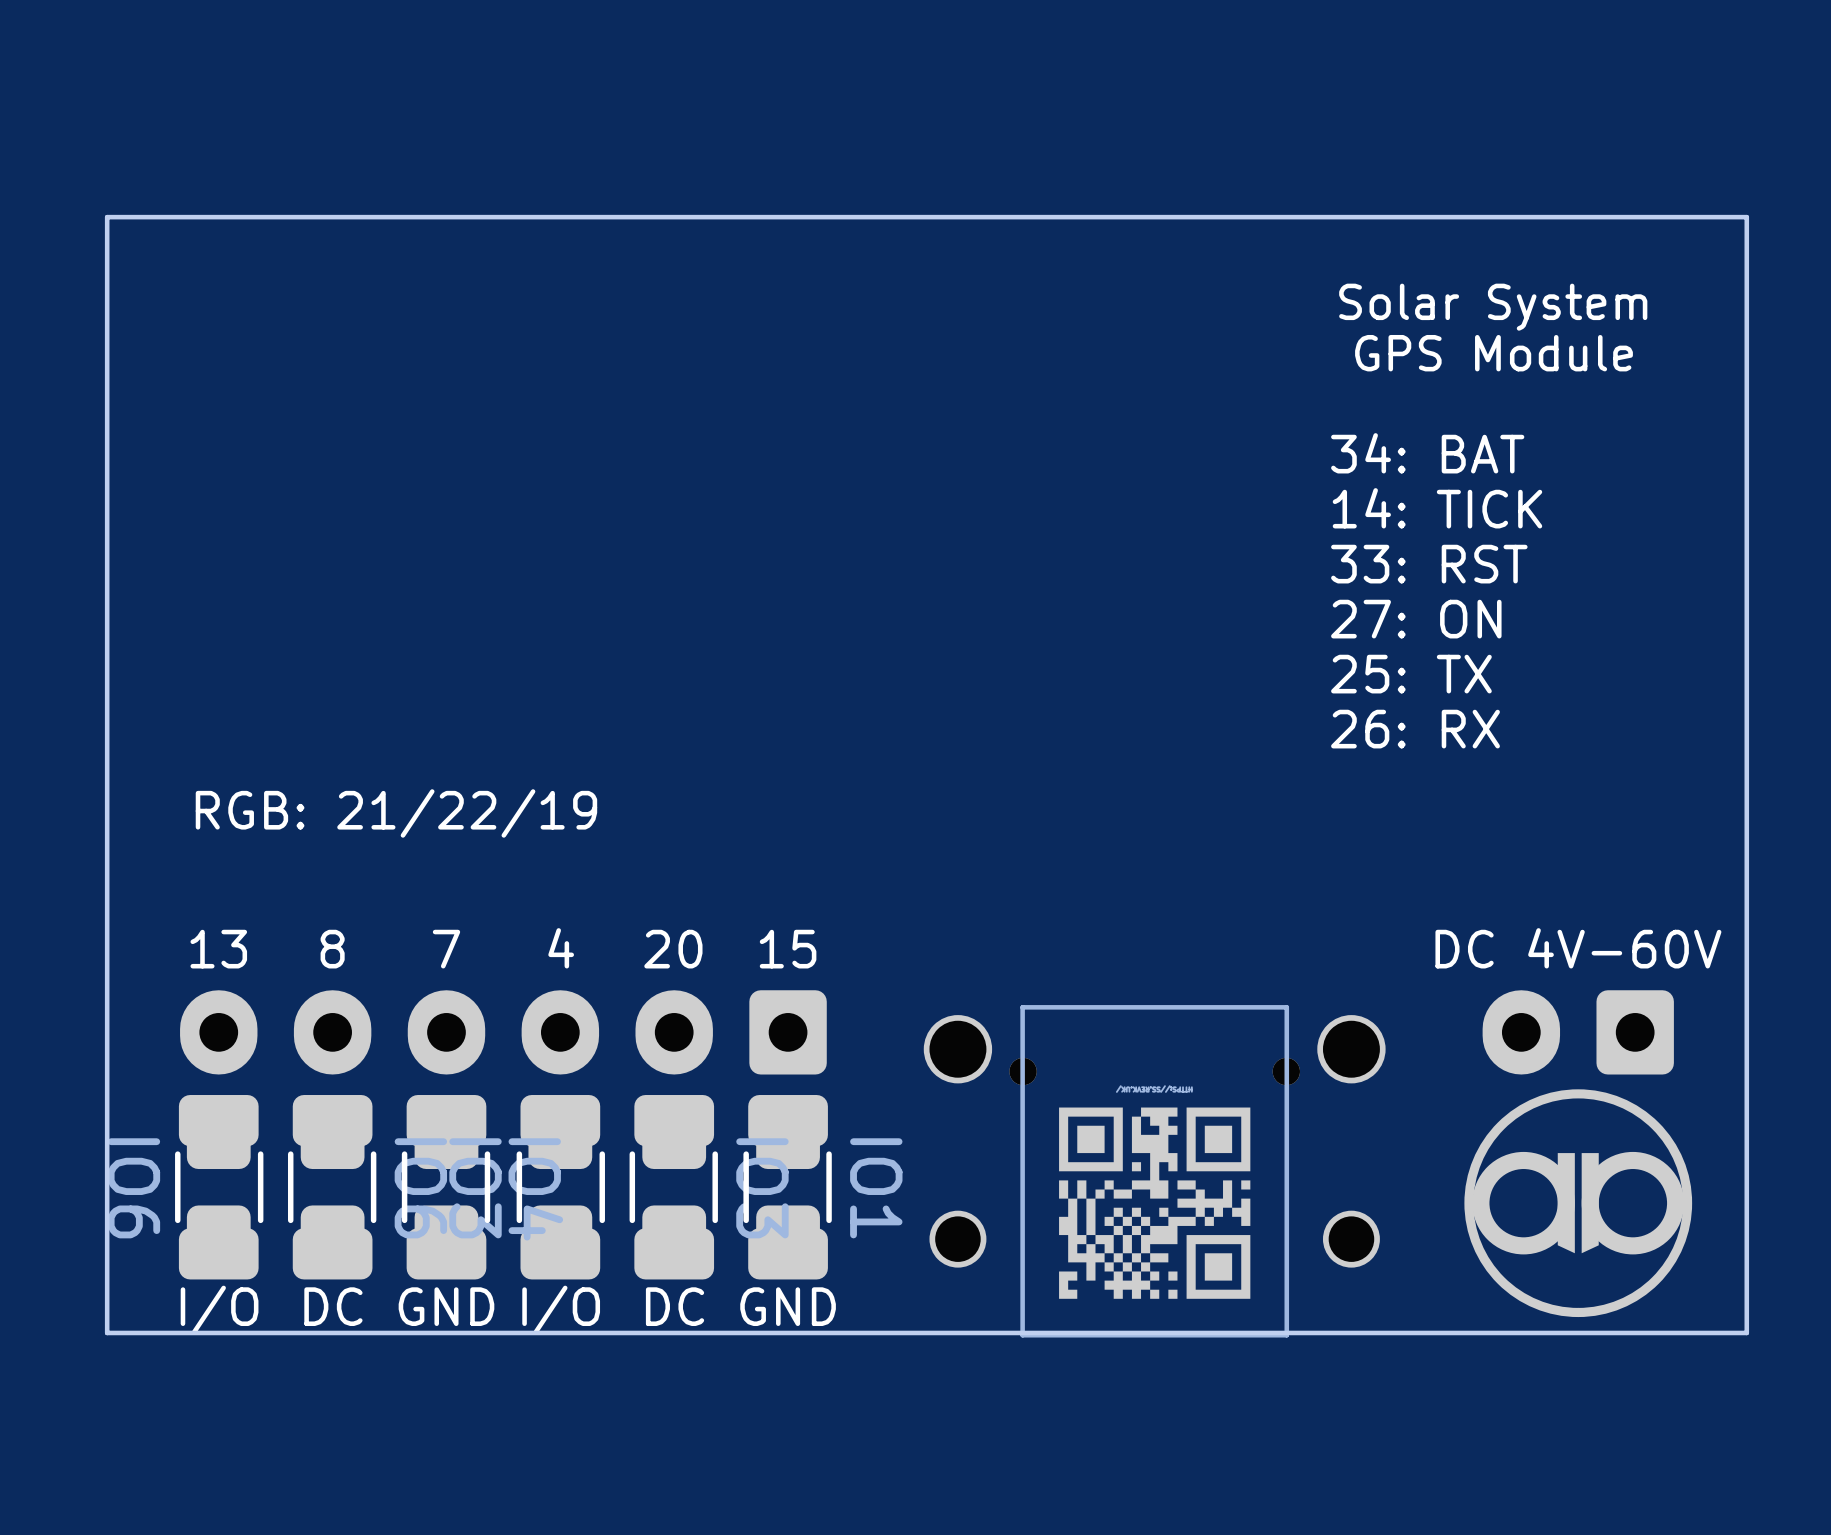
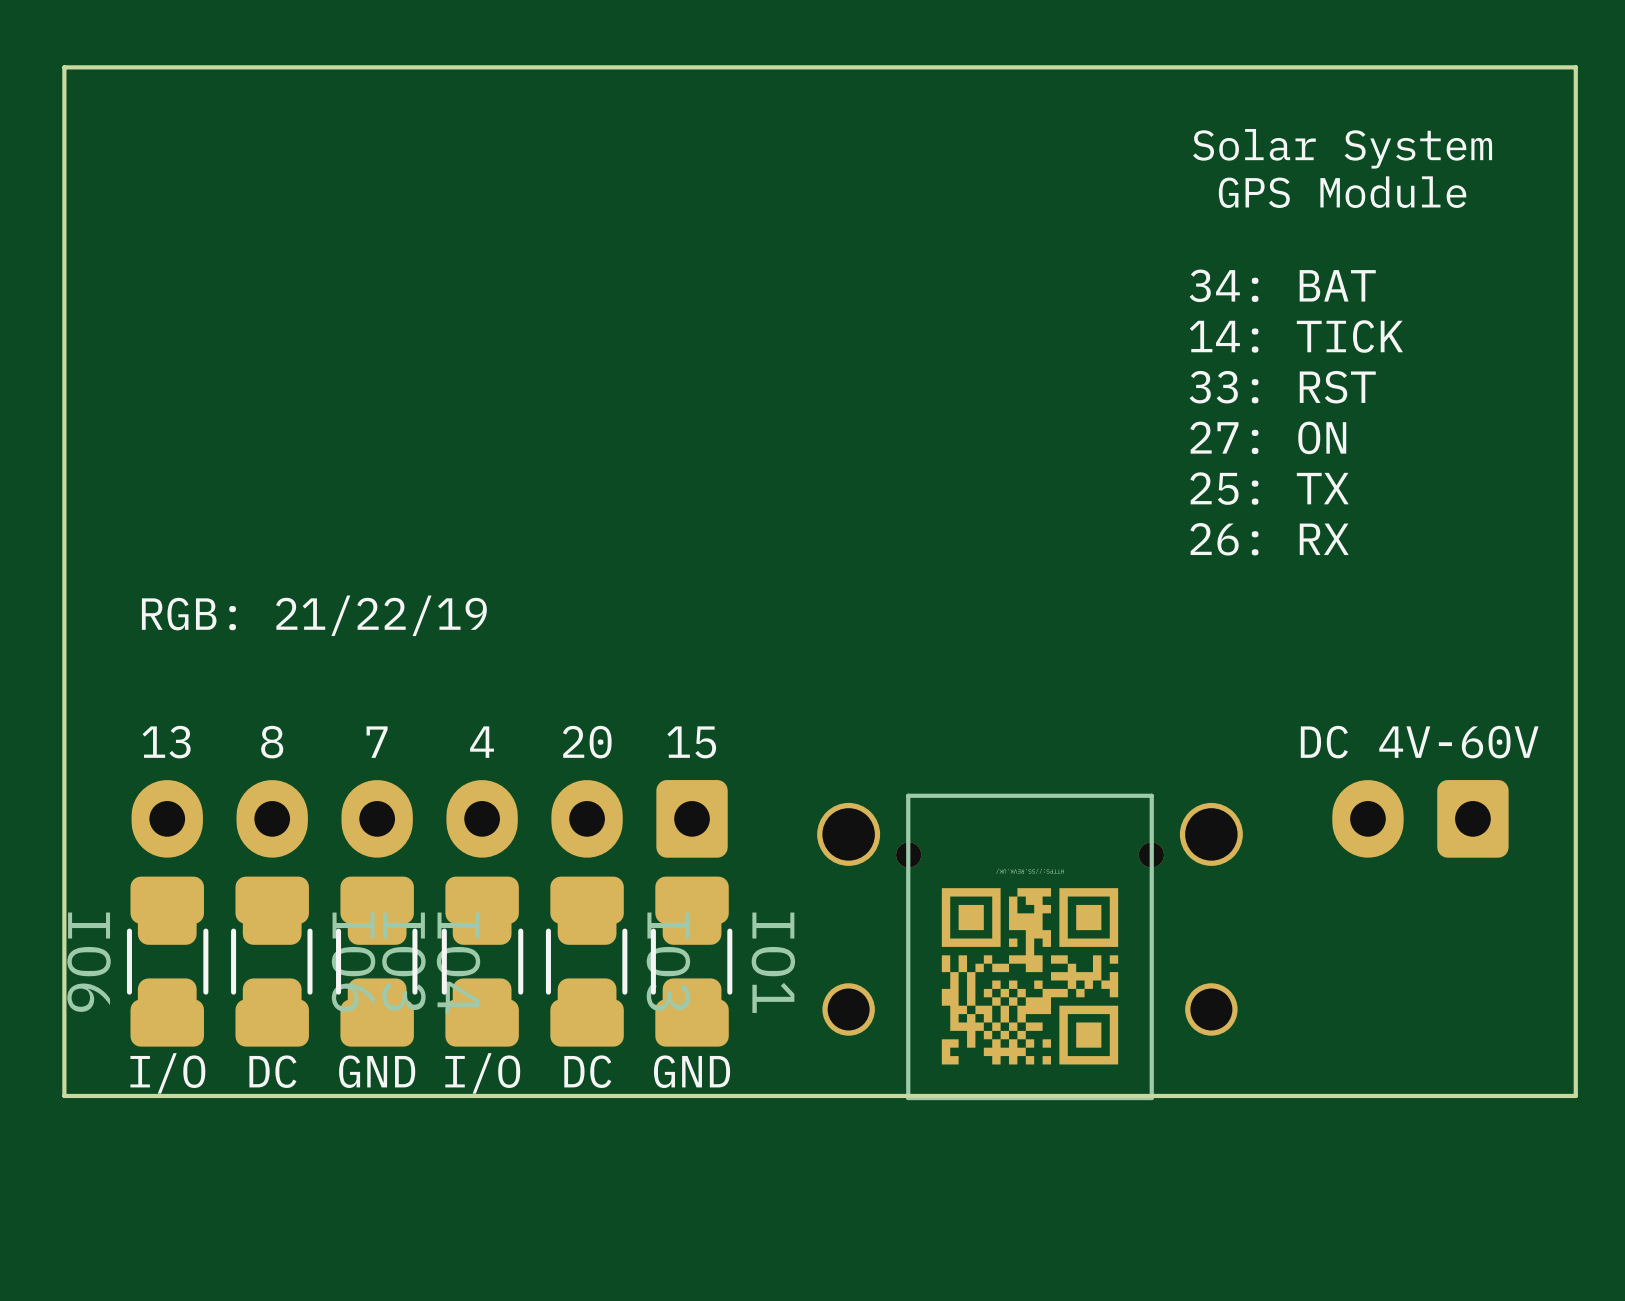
part: (1578, 1203) -> none

